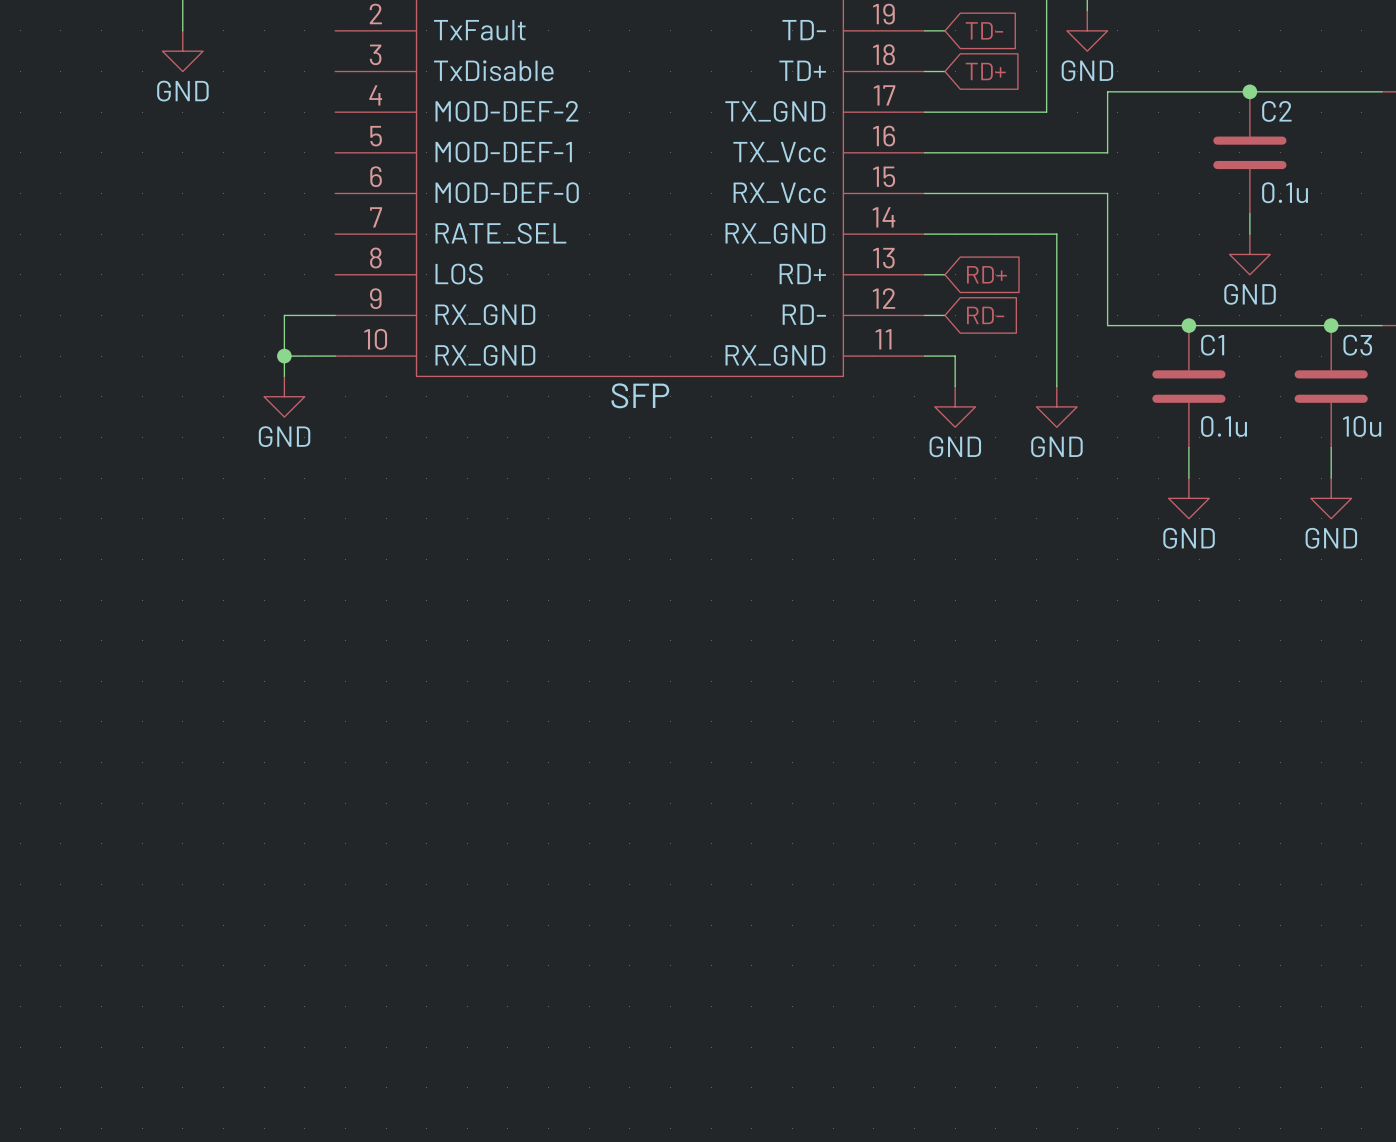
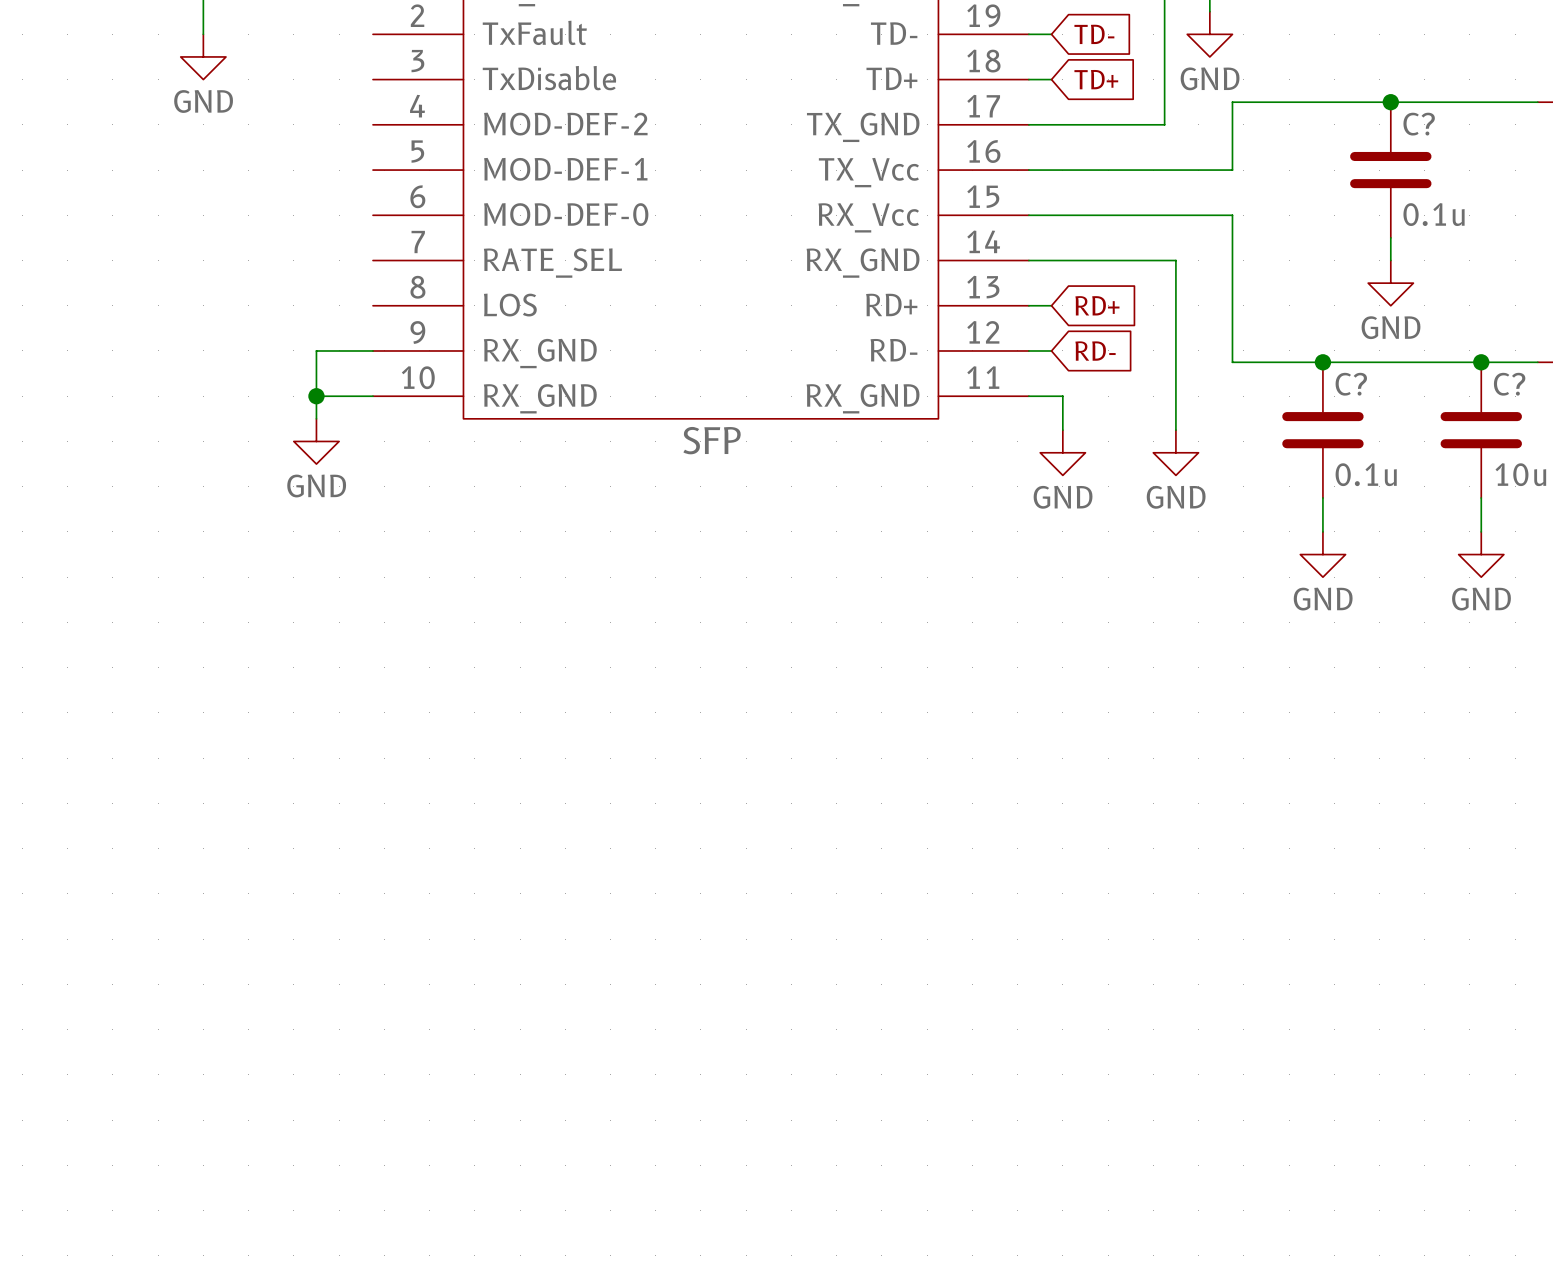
C2 name: C2 (1276, 111) -> C? (1419, 124)
C1 name: C1 (1212, 345) -> C? (1351, 384)
C3 name: C3 (1357, 345) -> C? (1509, 384)

